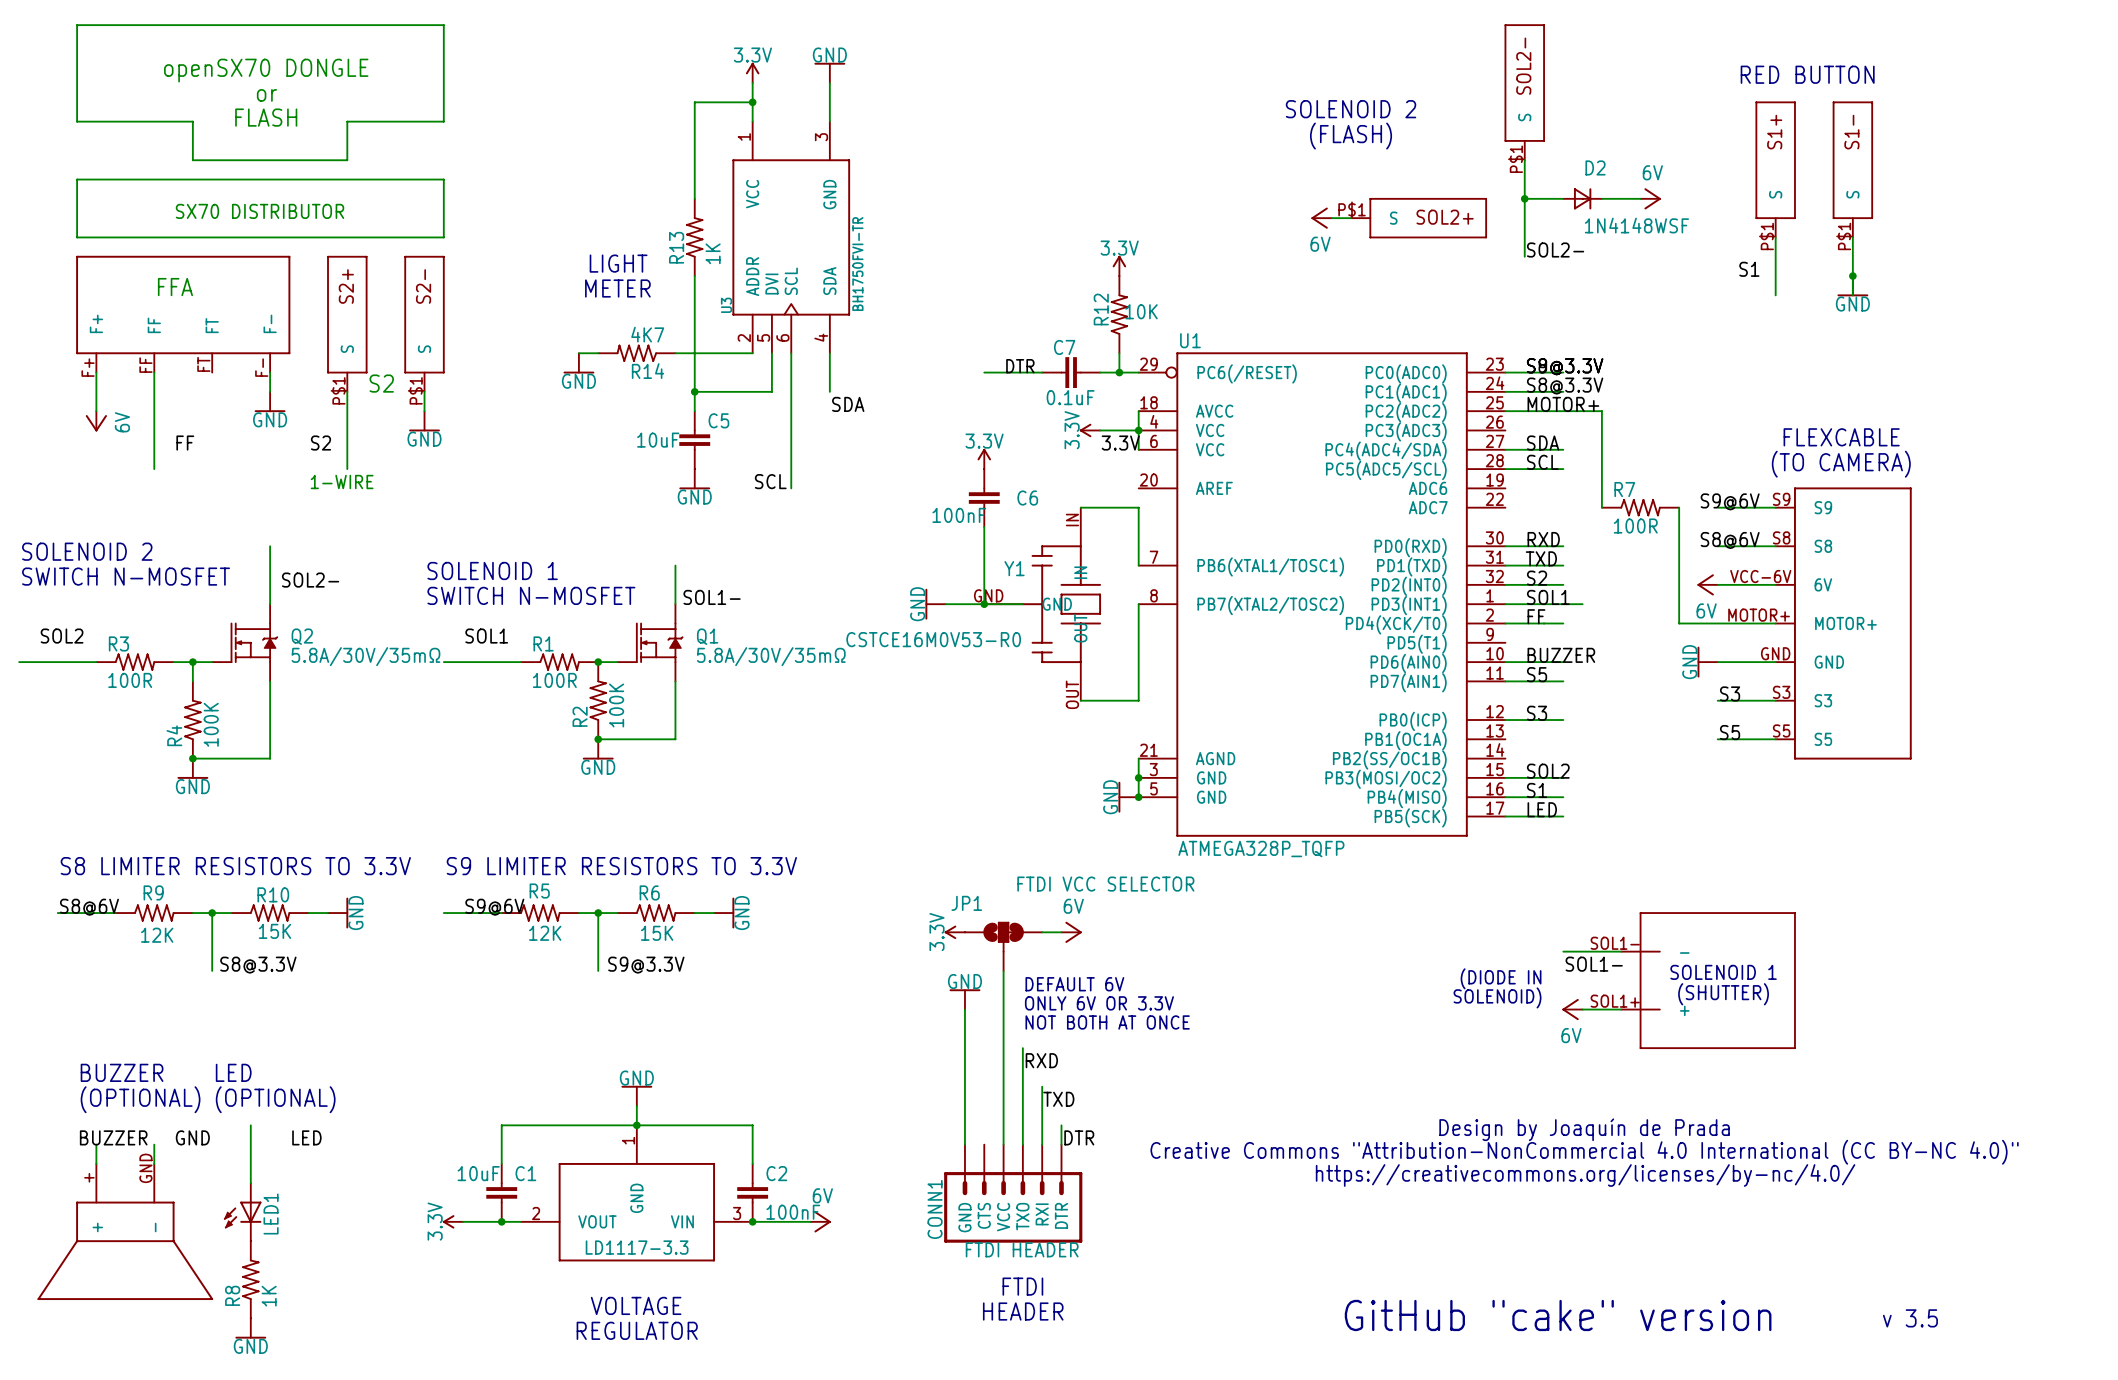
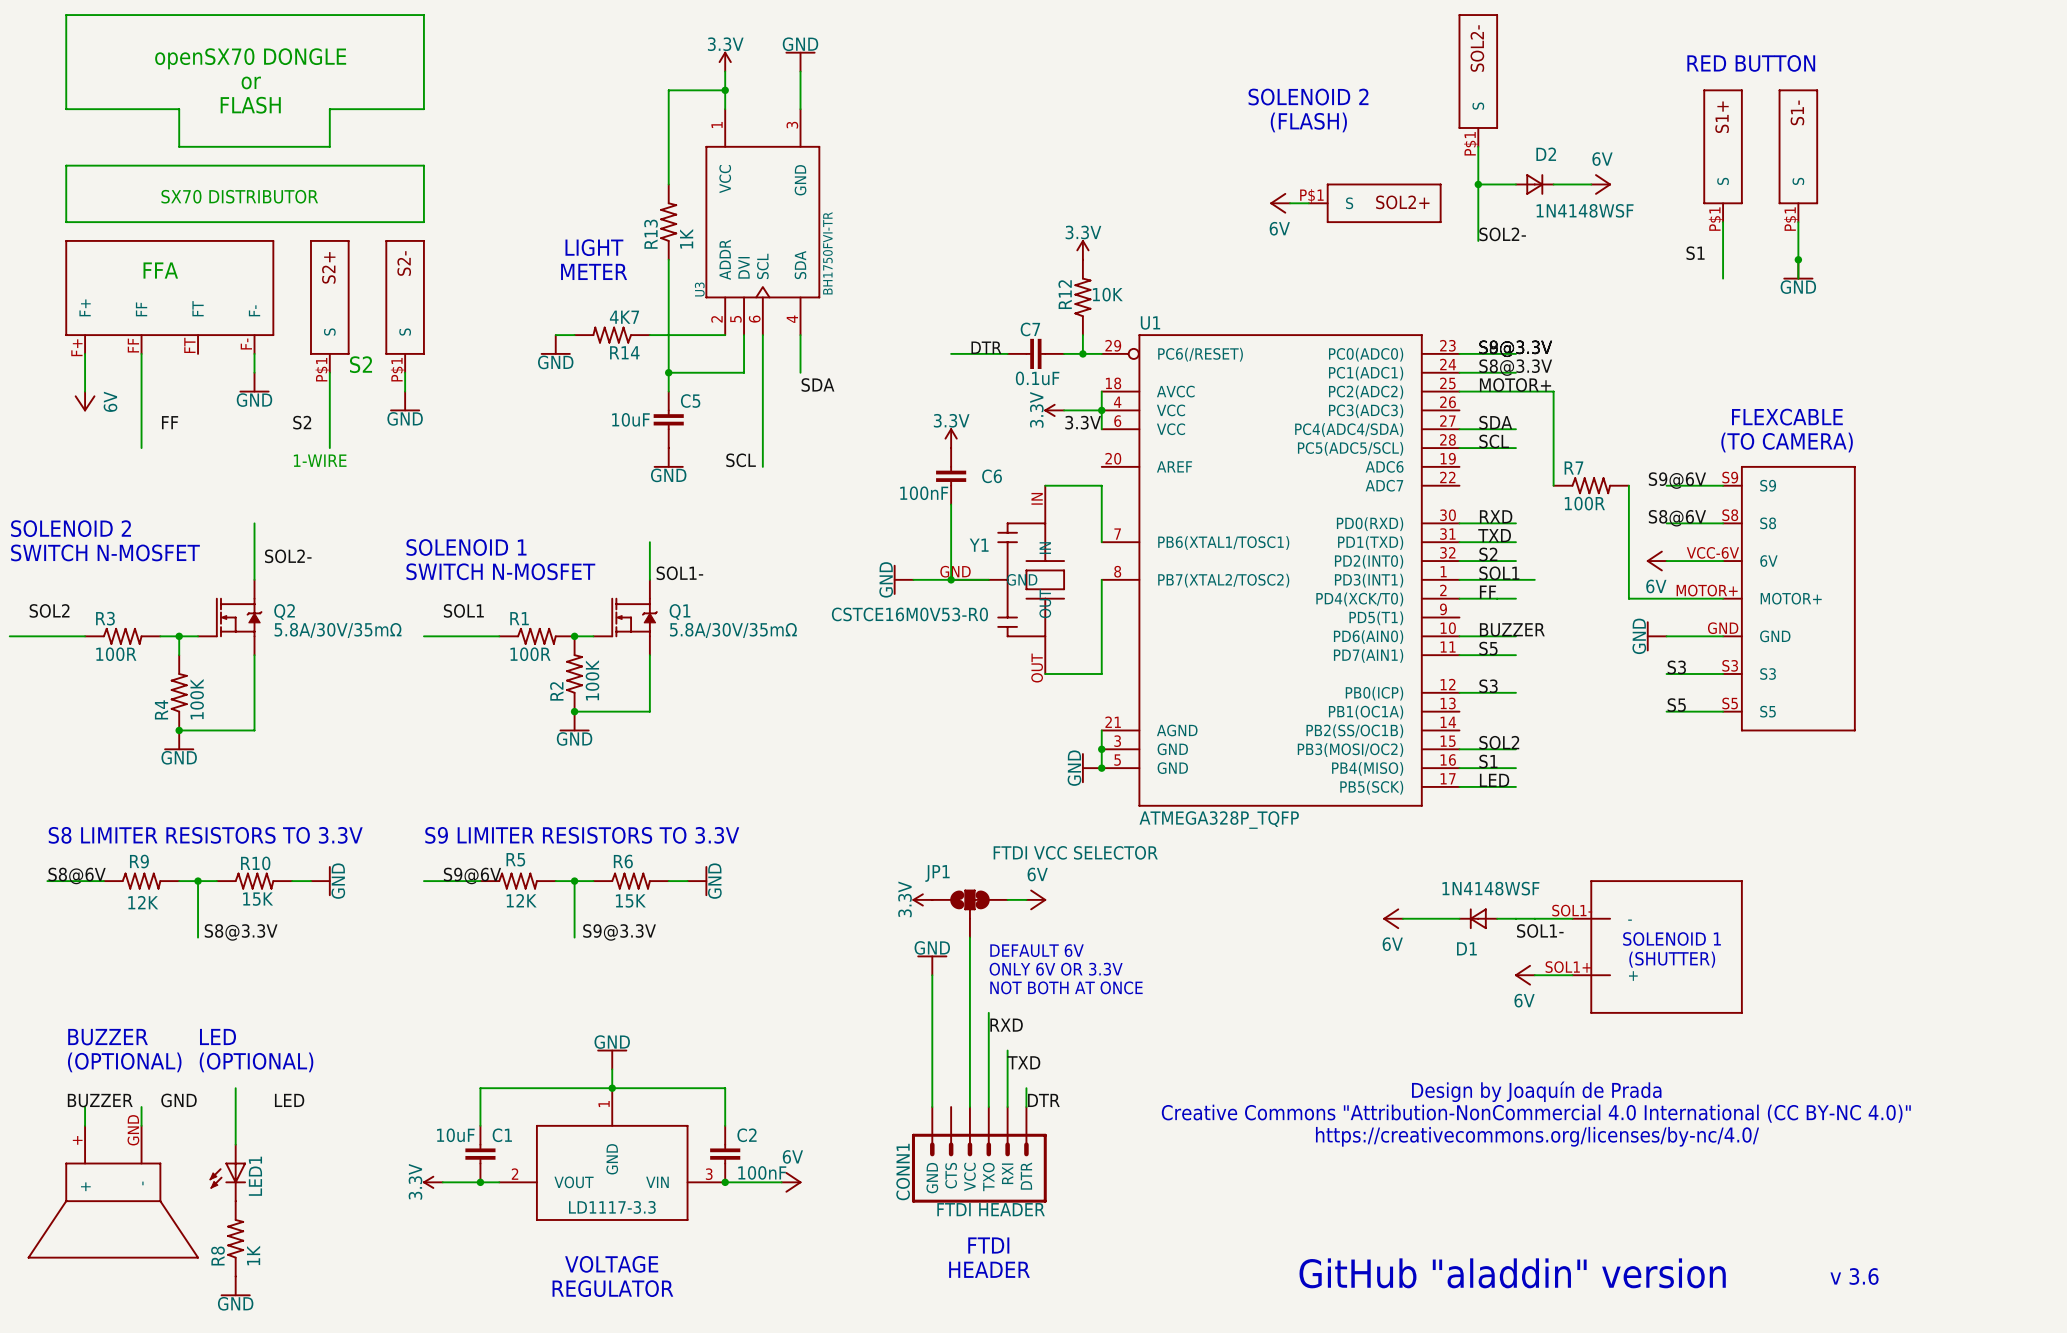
power symbol: none -> 6V (1393, 918)
wire: none -> (1402, 918) (1459, 918)
D1: none -> 1N4148WSF (1478, 918)
wire: none -> (1497, 918) (1515, 918)
text: (DIODE IN (1501, 978) -> none
text: SOLENOID) (1497, 997) -> none
text: GitHub "cake" version (1558, 1315) -> GitHub "aladdin" version (1512, 1273)
text: v 3.5 (1910, 1318) -> v 3.6 (1854, 1276)

